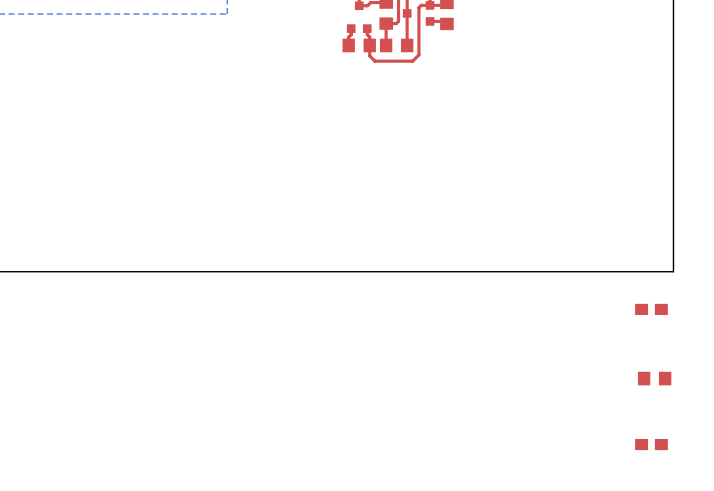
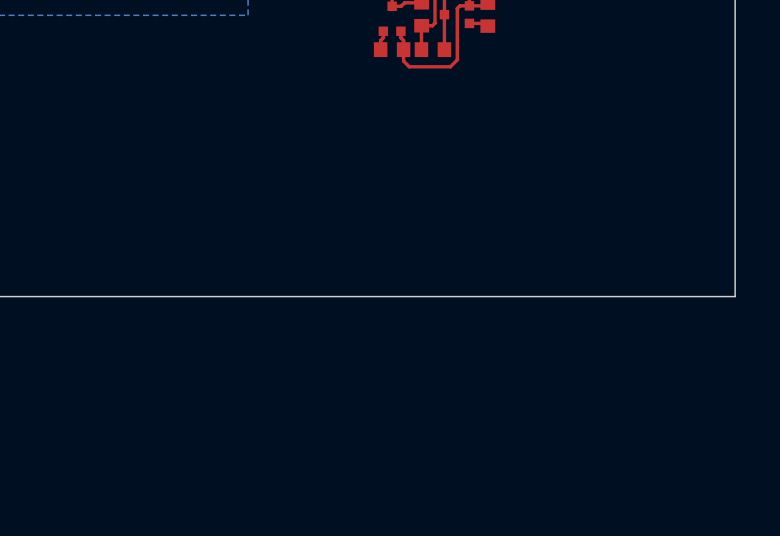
part: (651, 309) -> none
part: (654, 378) -> none
part: (651, 444) -> none

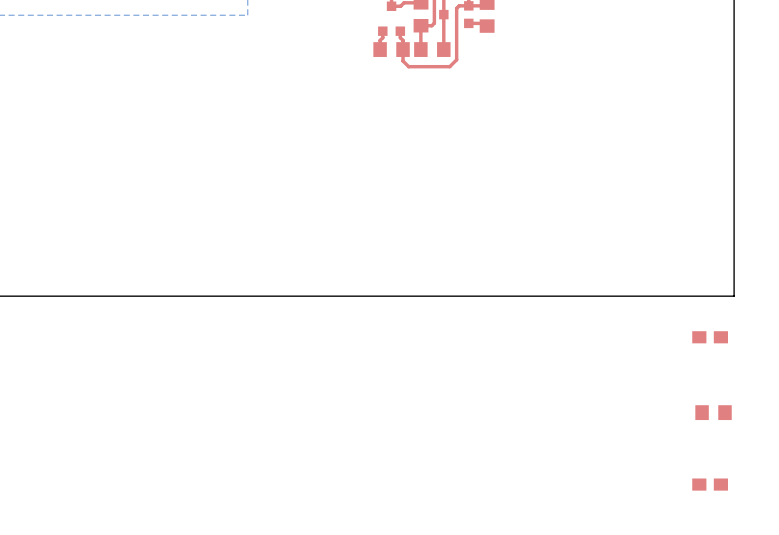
part: none -> (710, 337)
part: none -> (713, 412)
part: none -> (710, 484)

